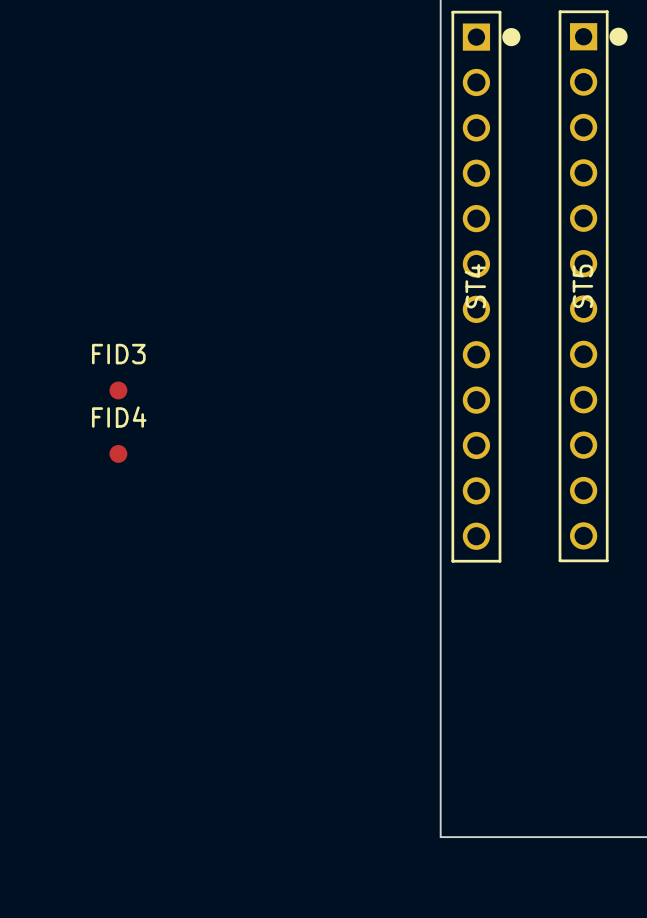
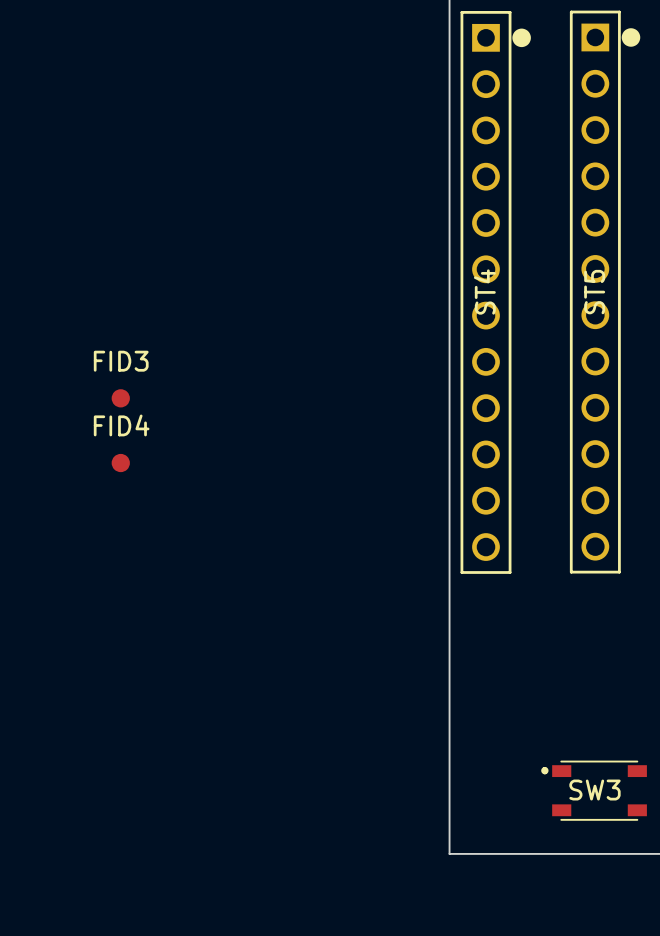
SW3: none -> (594, 790)

